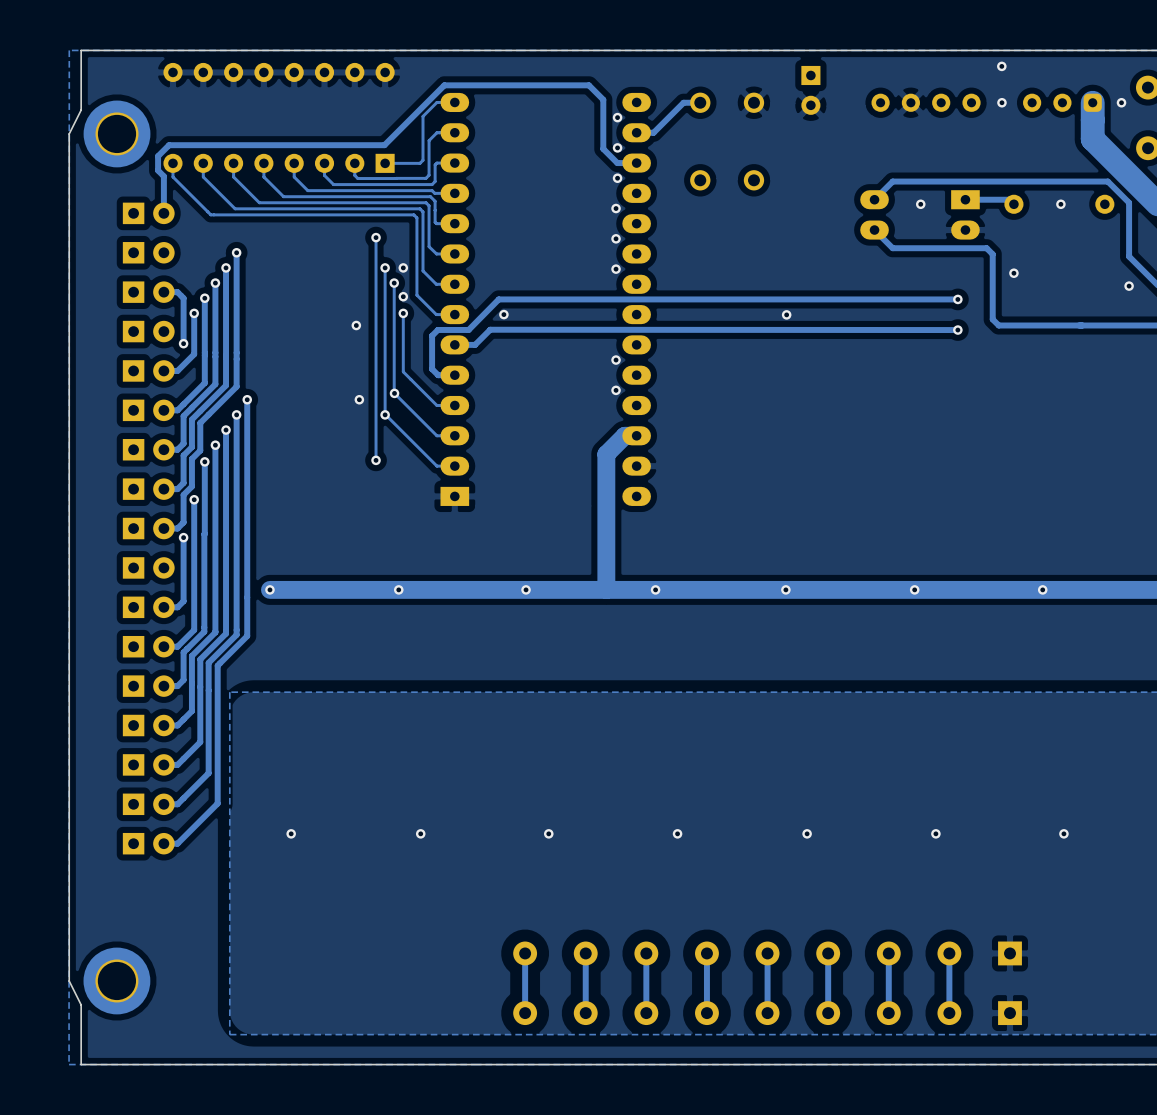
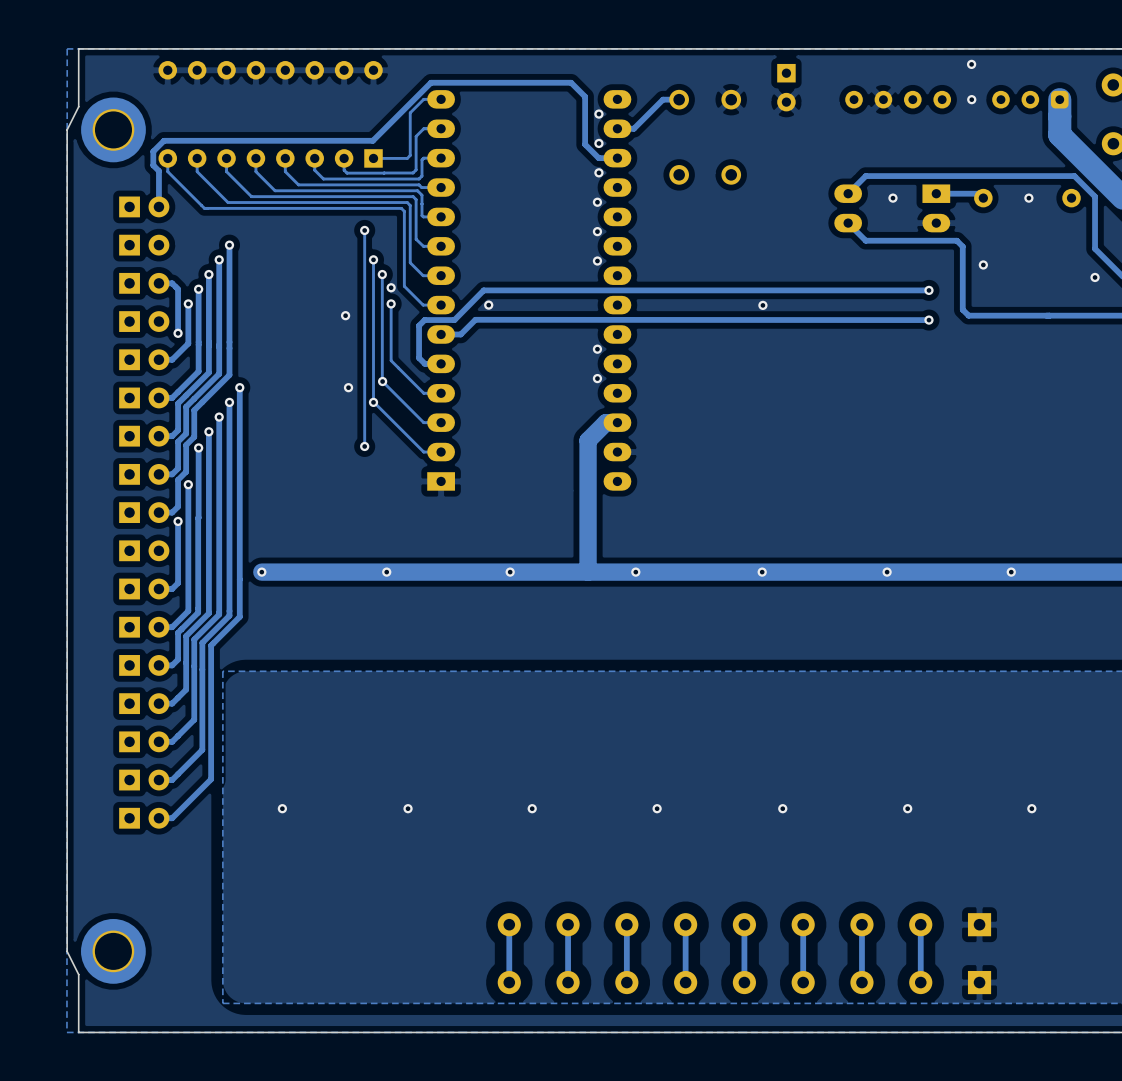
via: (1121, 102) -> none
via: (403, 267) -> none

